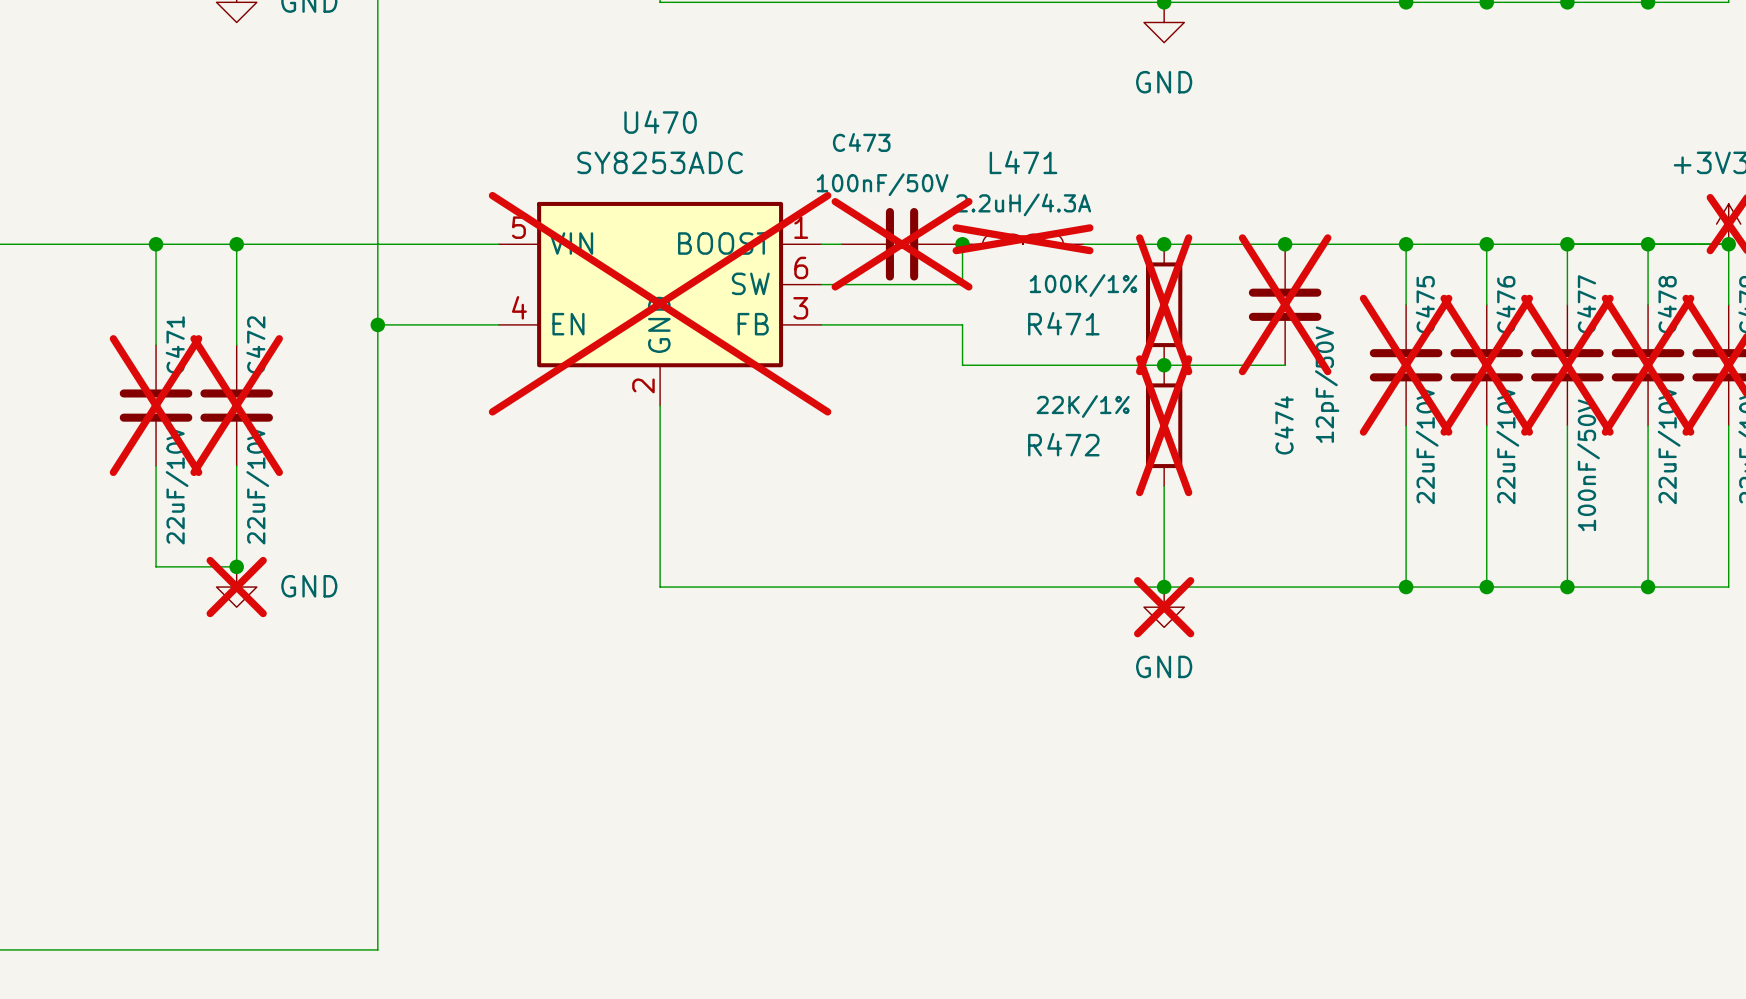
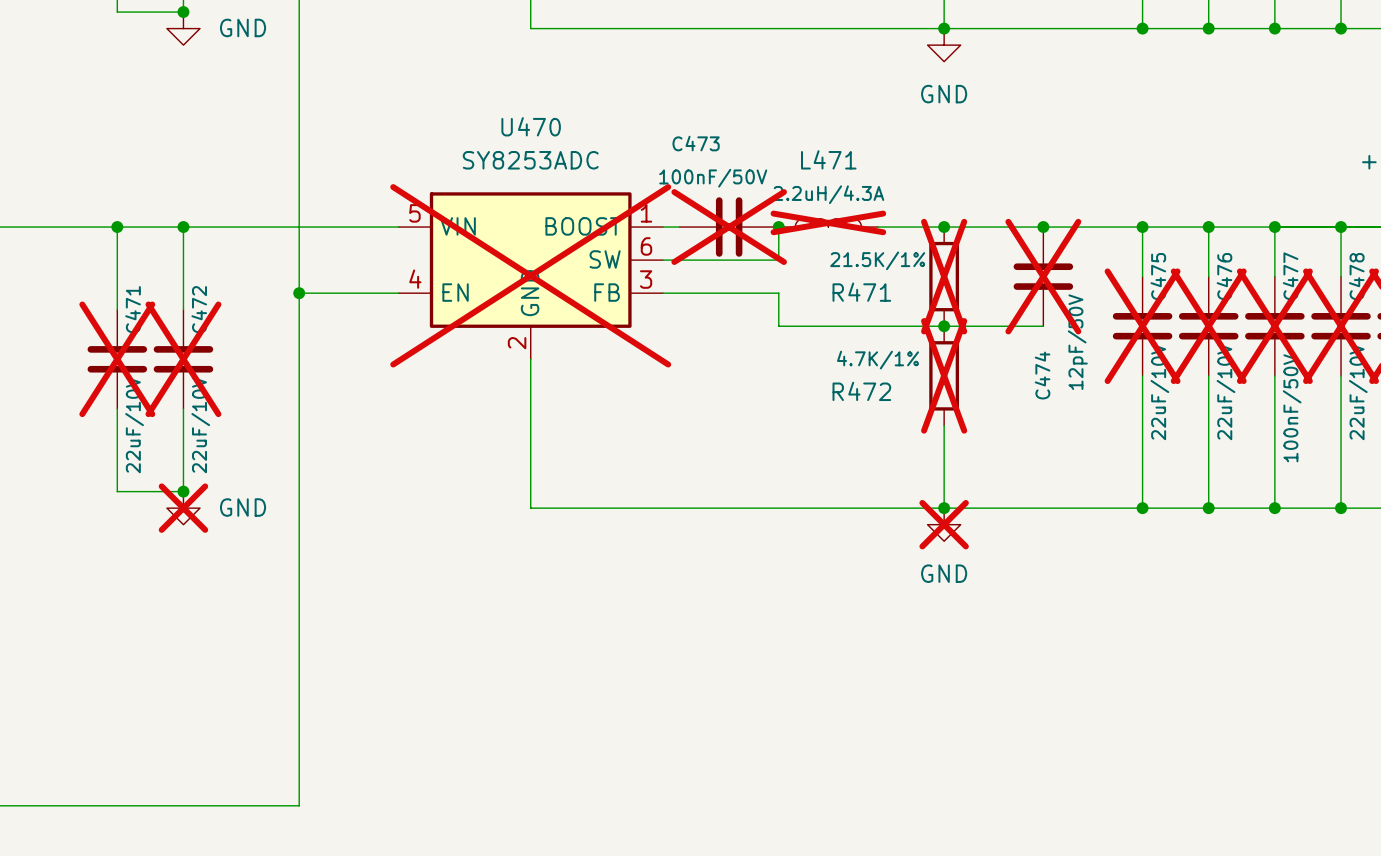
R471 value: 100K/1% (1083, 285) -> 21.5K/1% (877, 260)
R472 value: 22K/1% (1083, 406) -> 4.7K/1% (877, 360)

